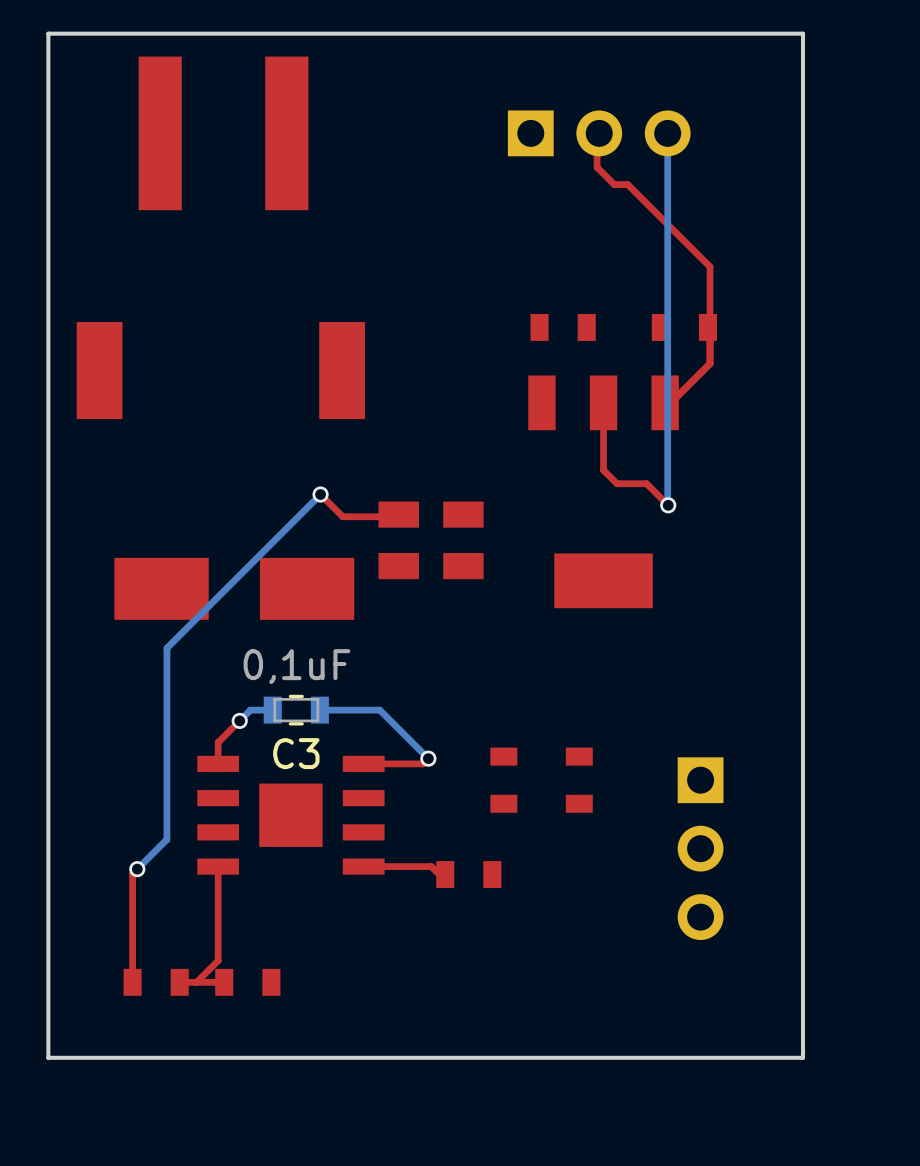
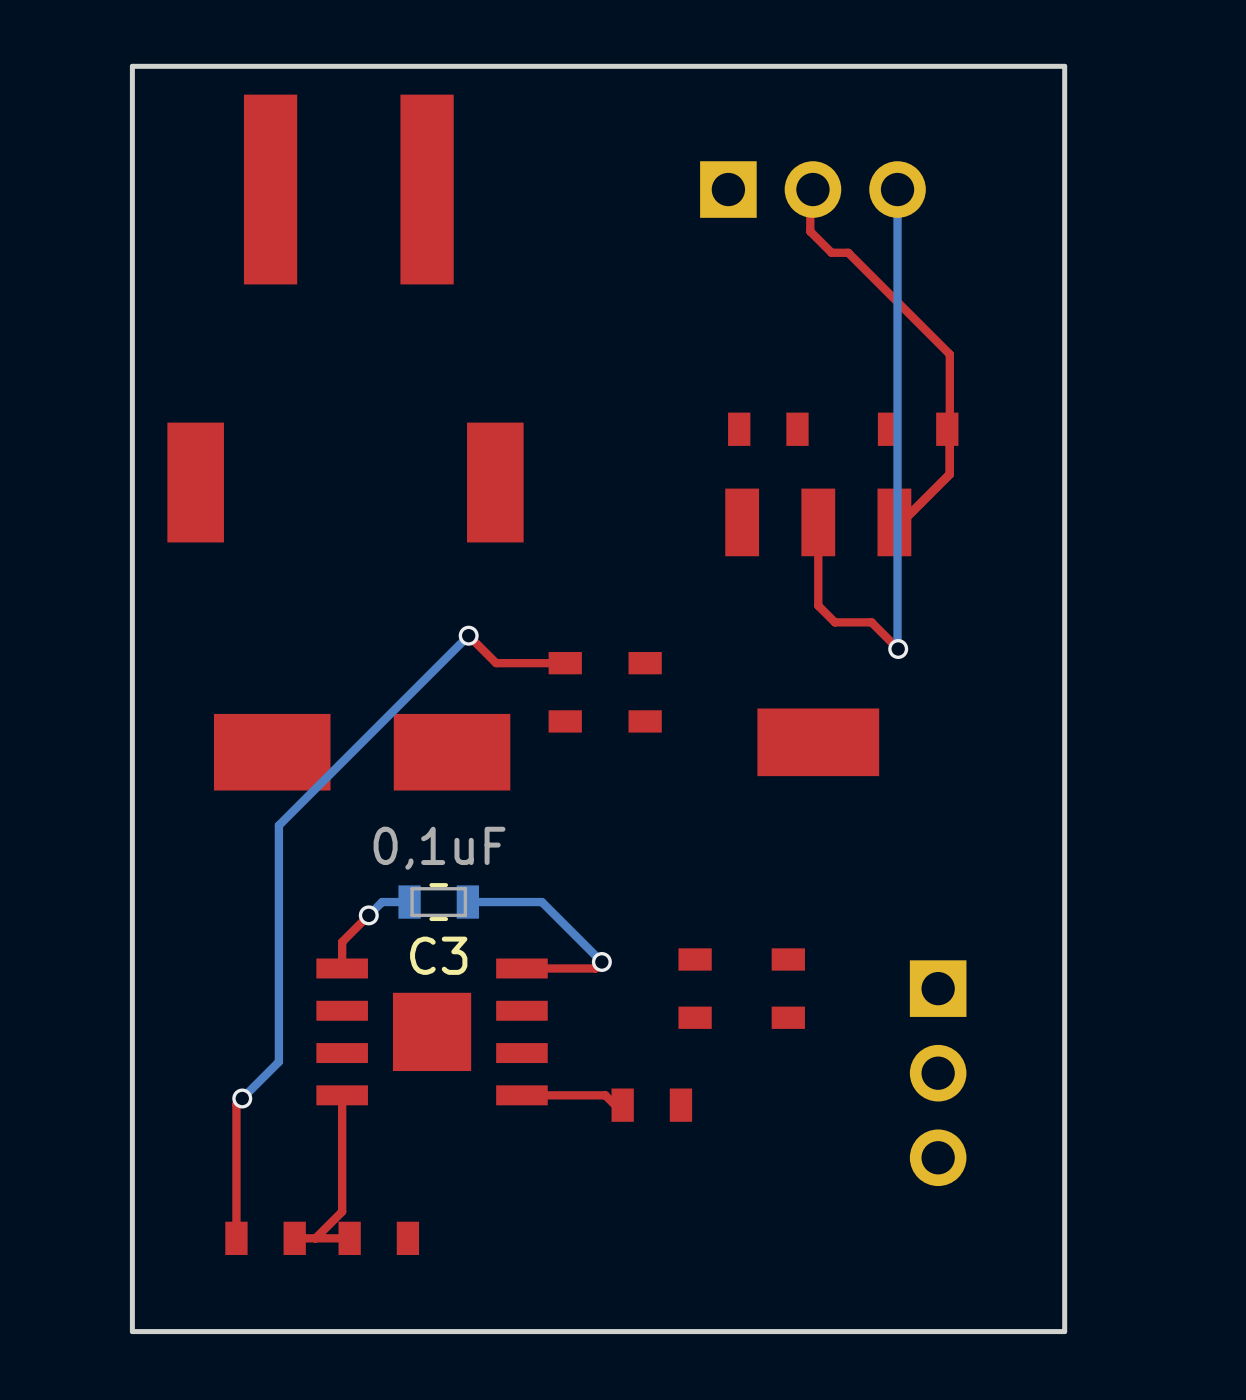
part footprint: [378, 501, 419, 580] -> [548, 652, 582, 733]
part footprint: [443, 501, 484, 580] -> [628, 652, 662, 733]

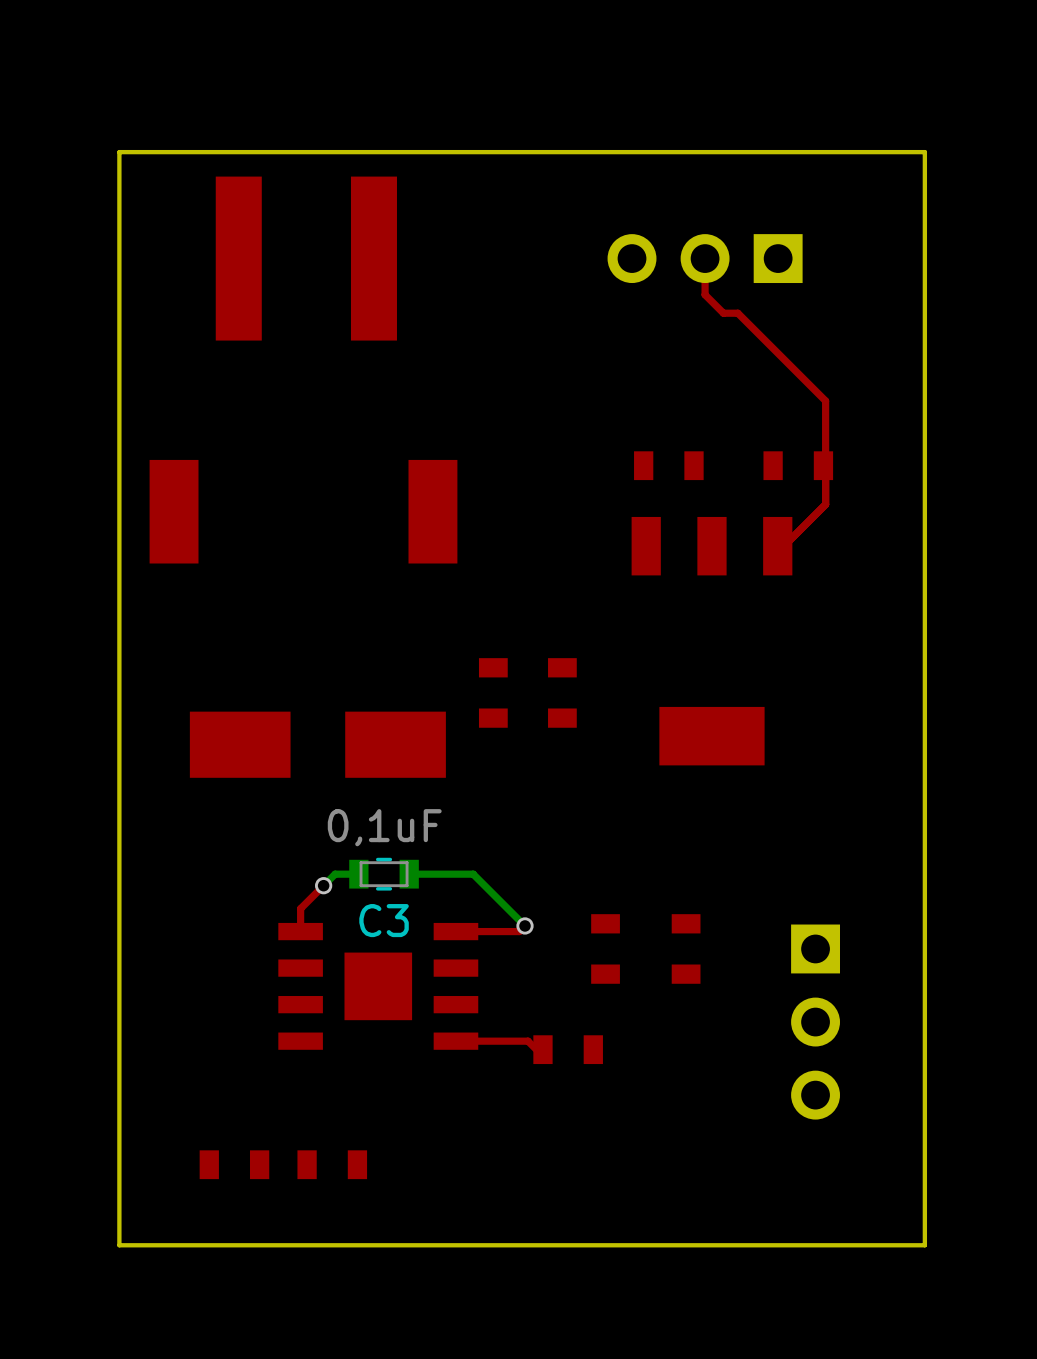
part rotation: 0° (812, 189) -> 180° (705, 258)
bottom track: (897, 189) (898, 649) -> none
top track: (818, 522) (818, 605) (834, 622) (871, 622) (898, 649) -> none
bottom track: (468, 635) (278, 825) (278, 1061) (242, 1098) -> none
top track: (468, 635) (496, 663) (565, 663) -> none
via: (468, 635) -> none
via: (898, 649) -> none
top track: (342, 1095) (342, 1211) (315, 1238) -> none
top track: (242, 1098) (236, 1104) (236, 1238) -> none
via: (242, 1098) -> none
top track: (349, 1238) (294, 1238) -> none

